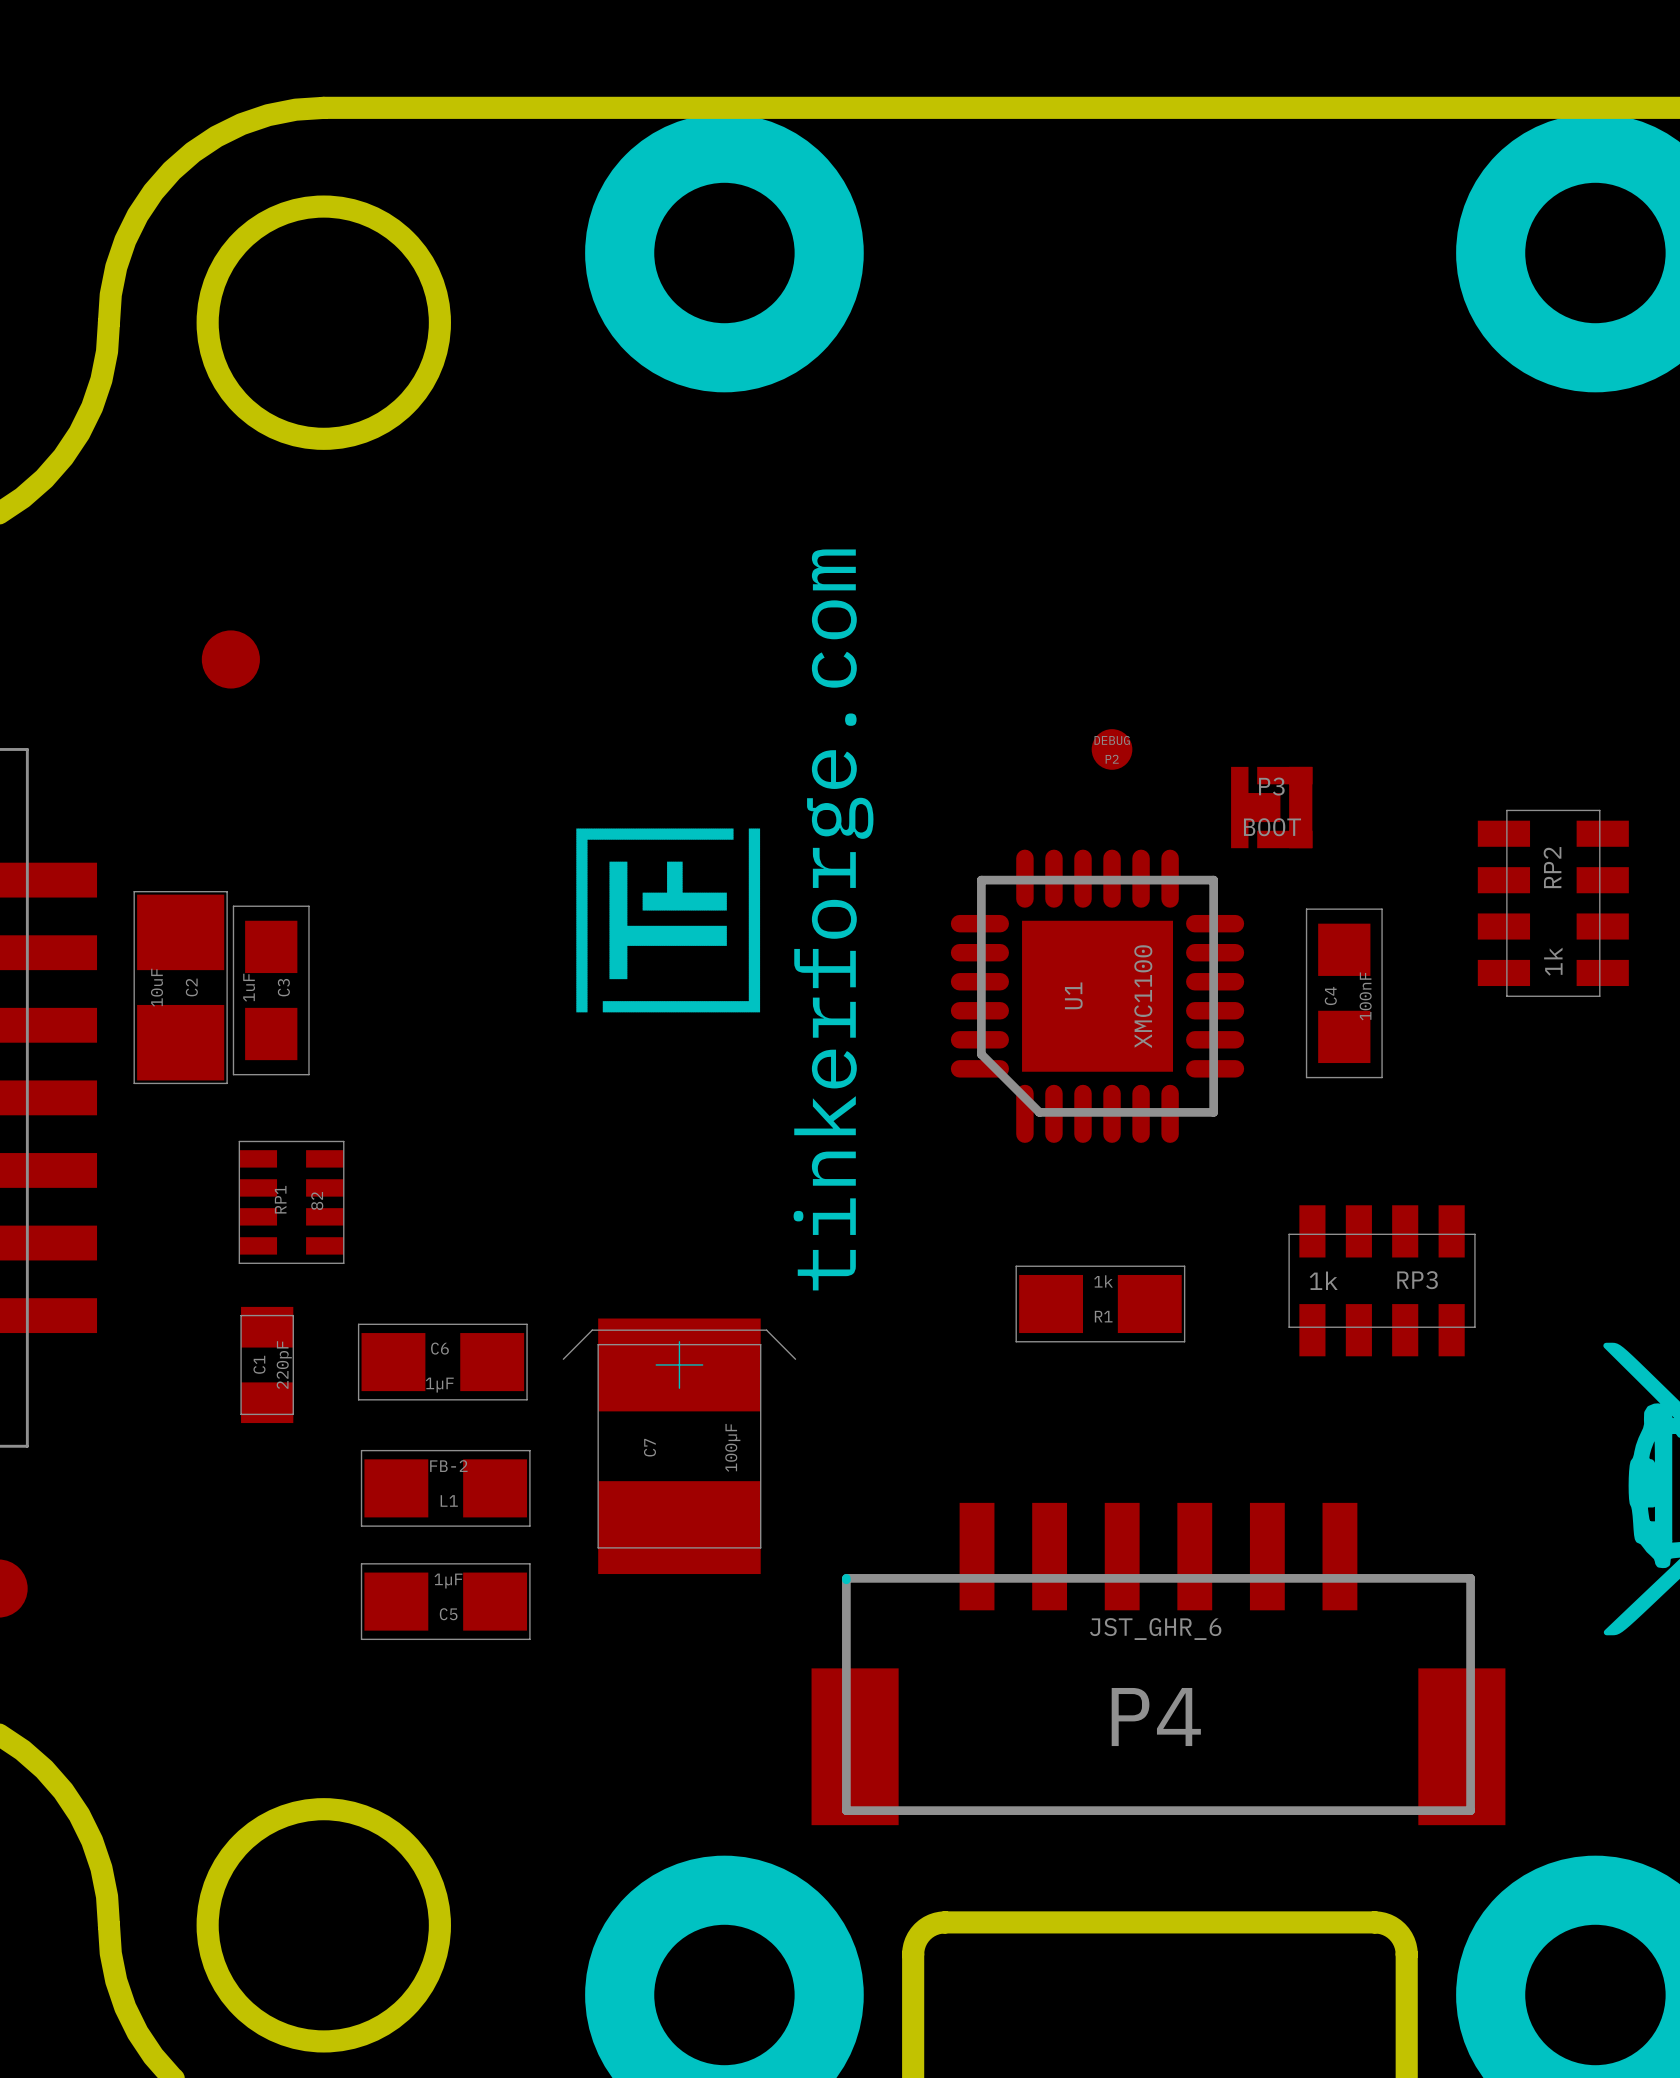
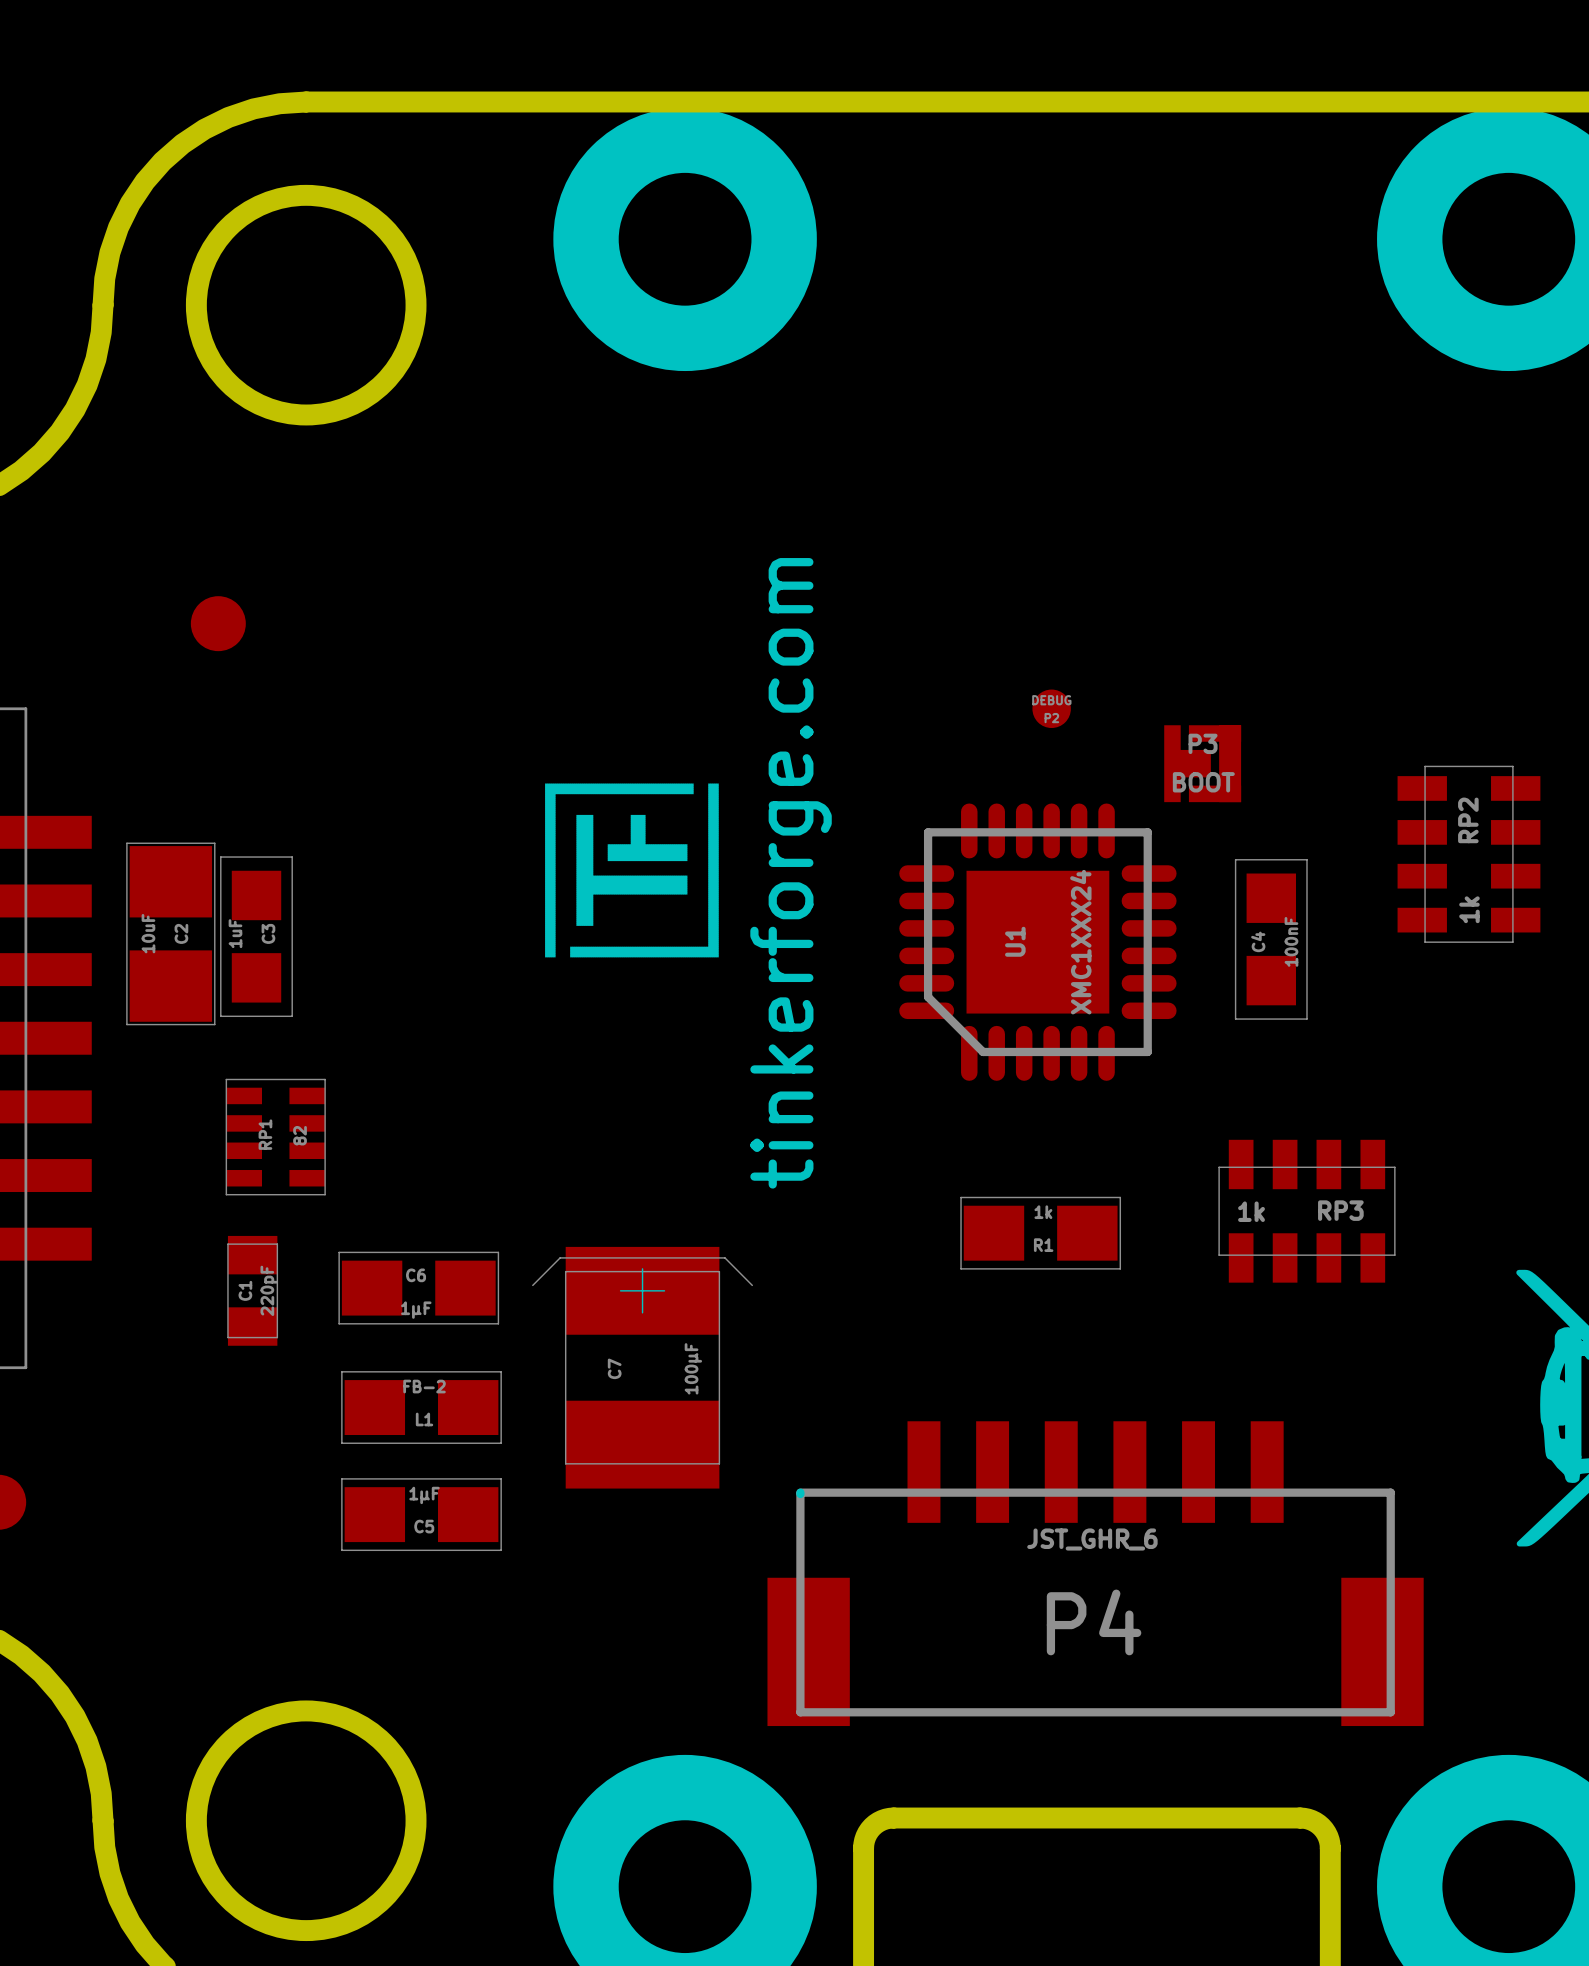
U1 value: XMC1100 (1143, 996) -> XMC1XXX24 (1080, 942)

